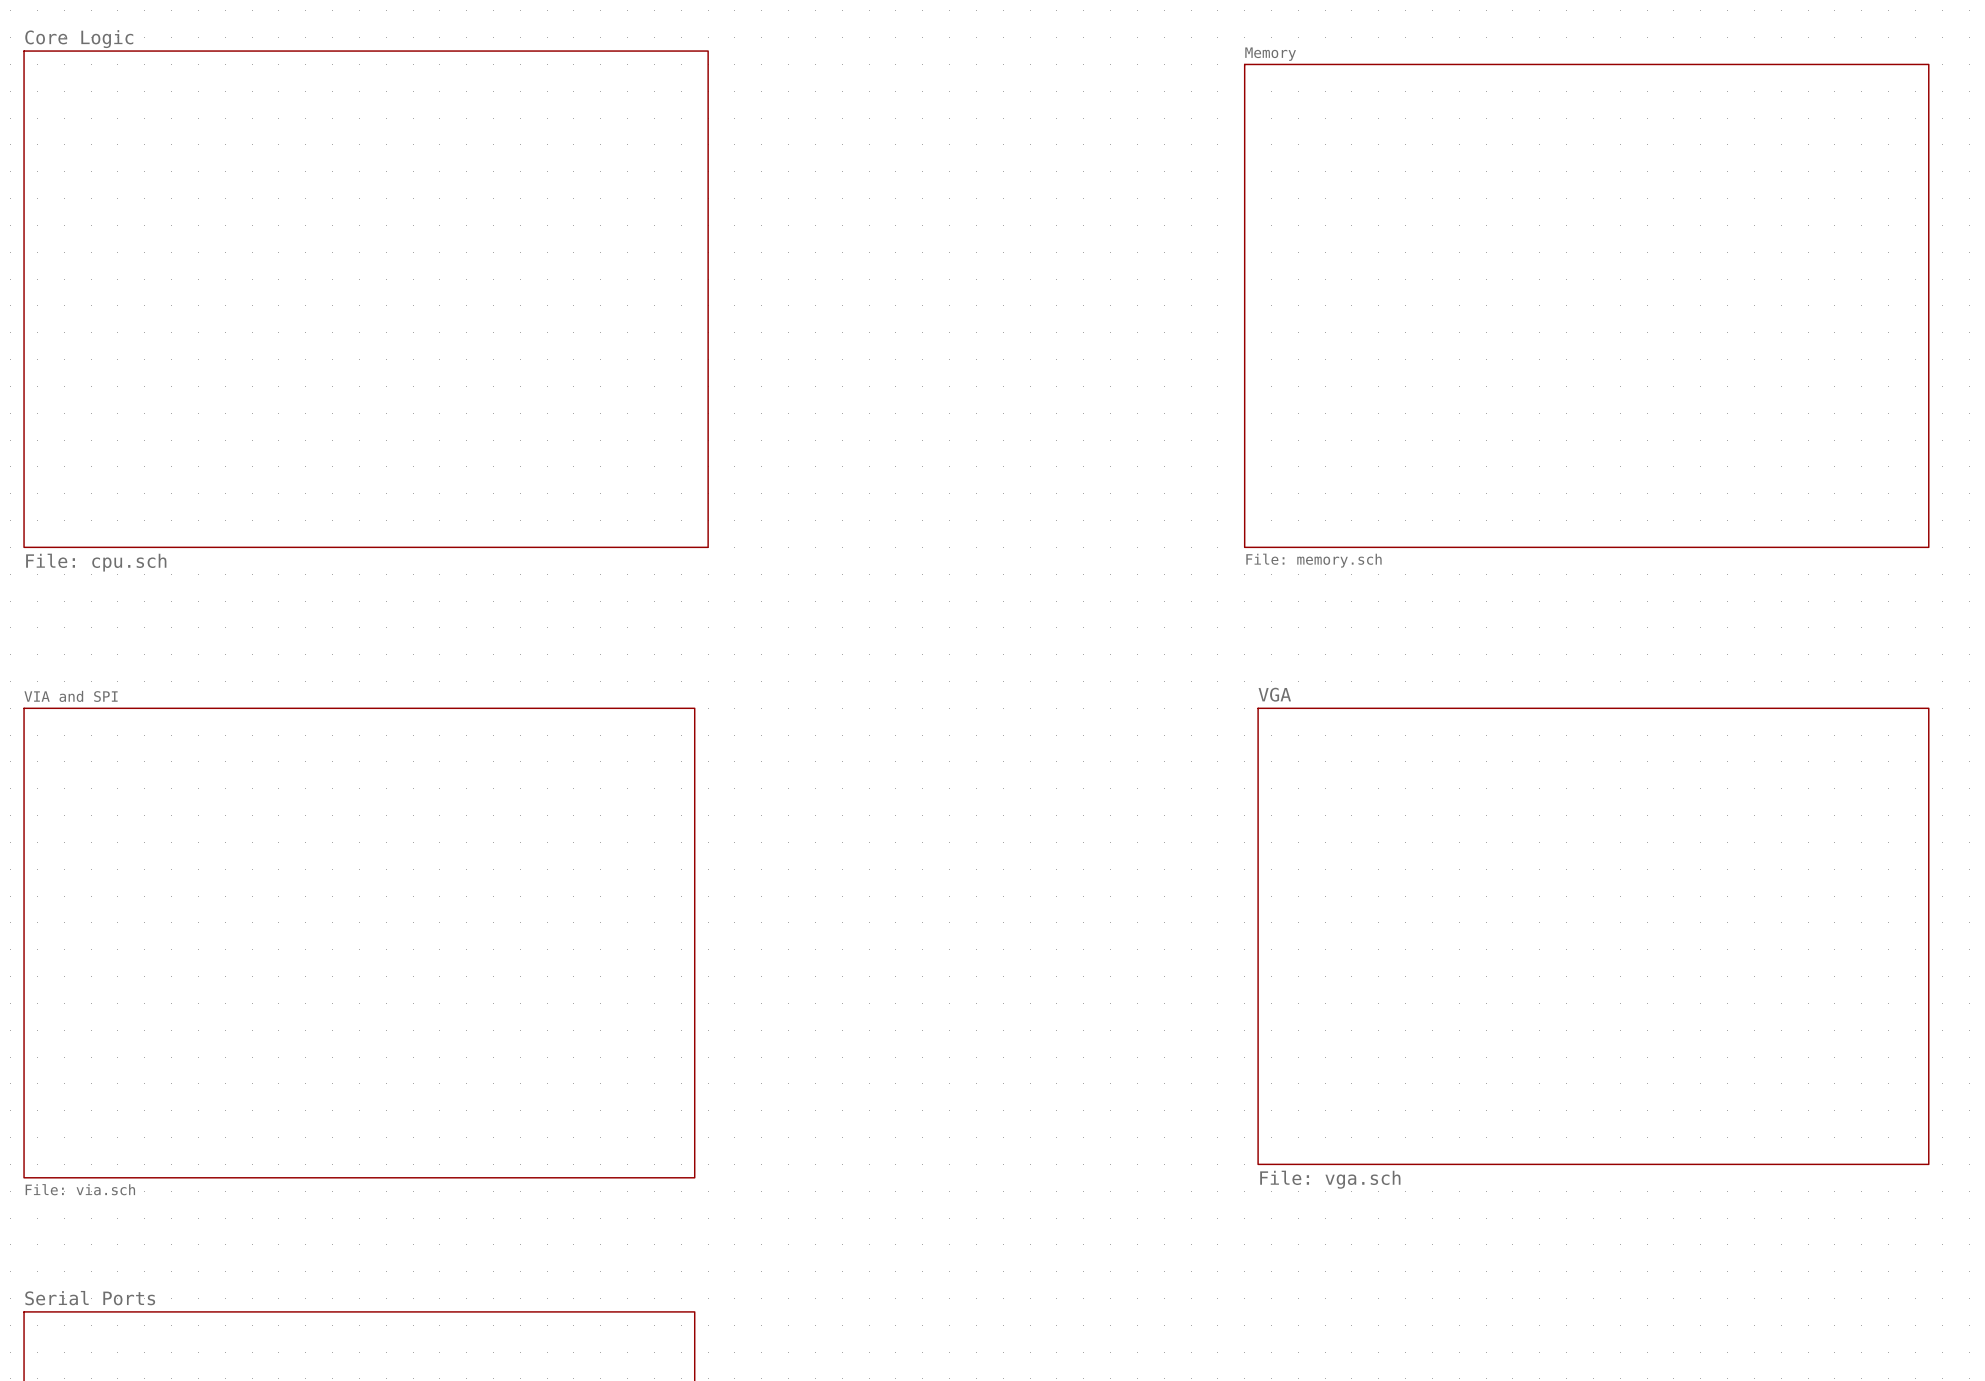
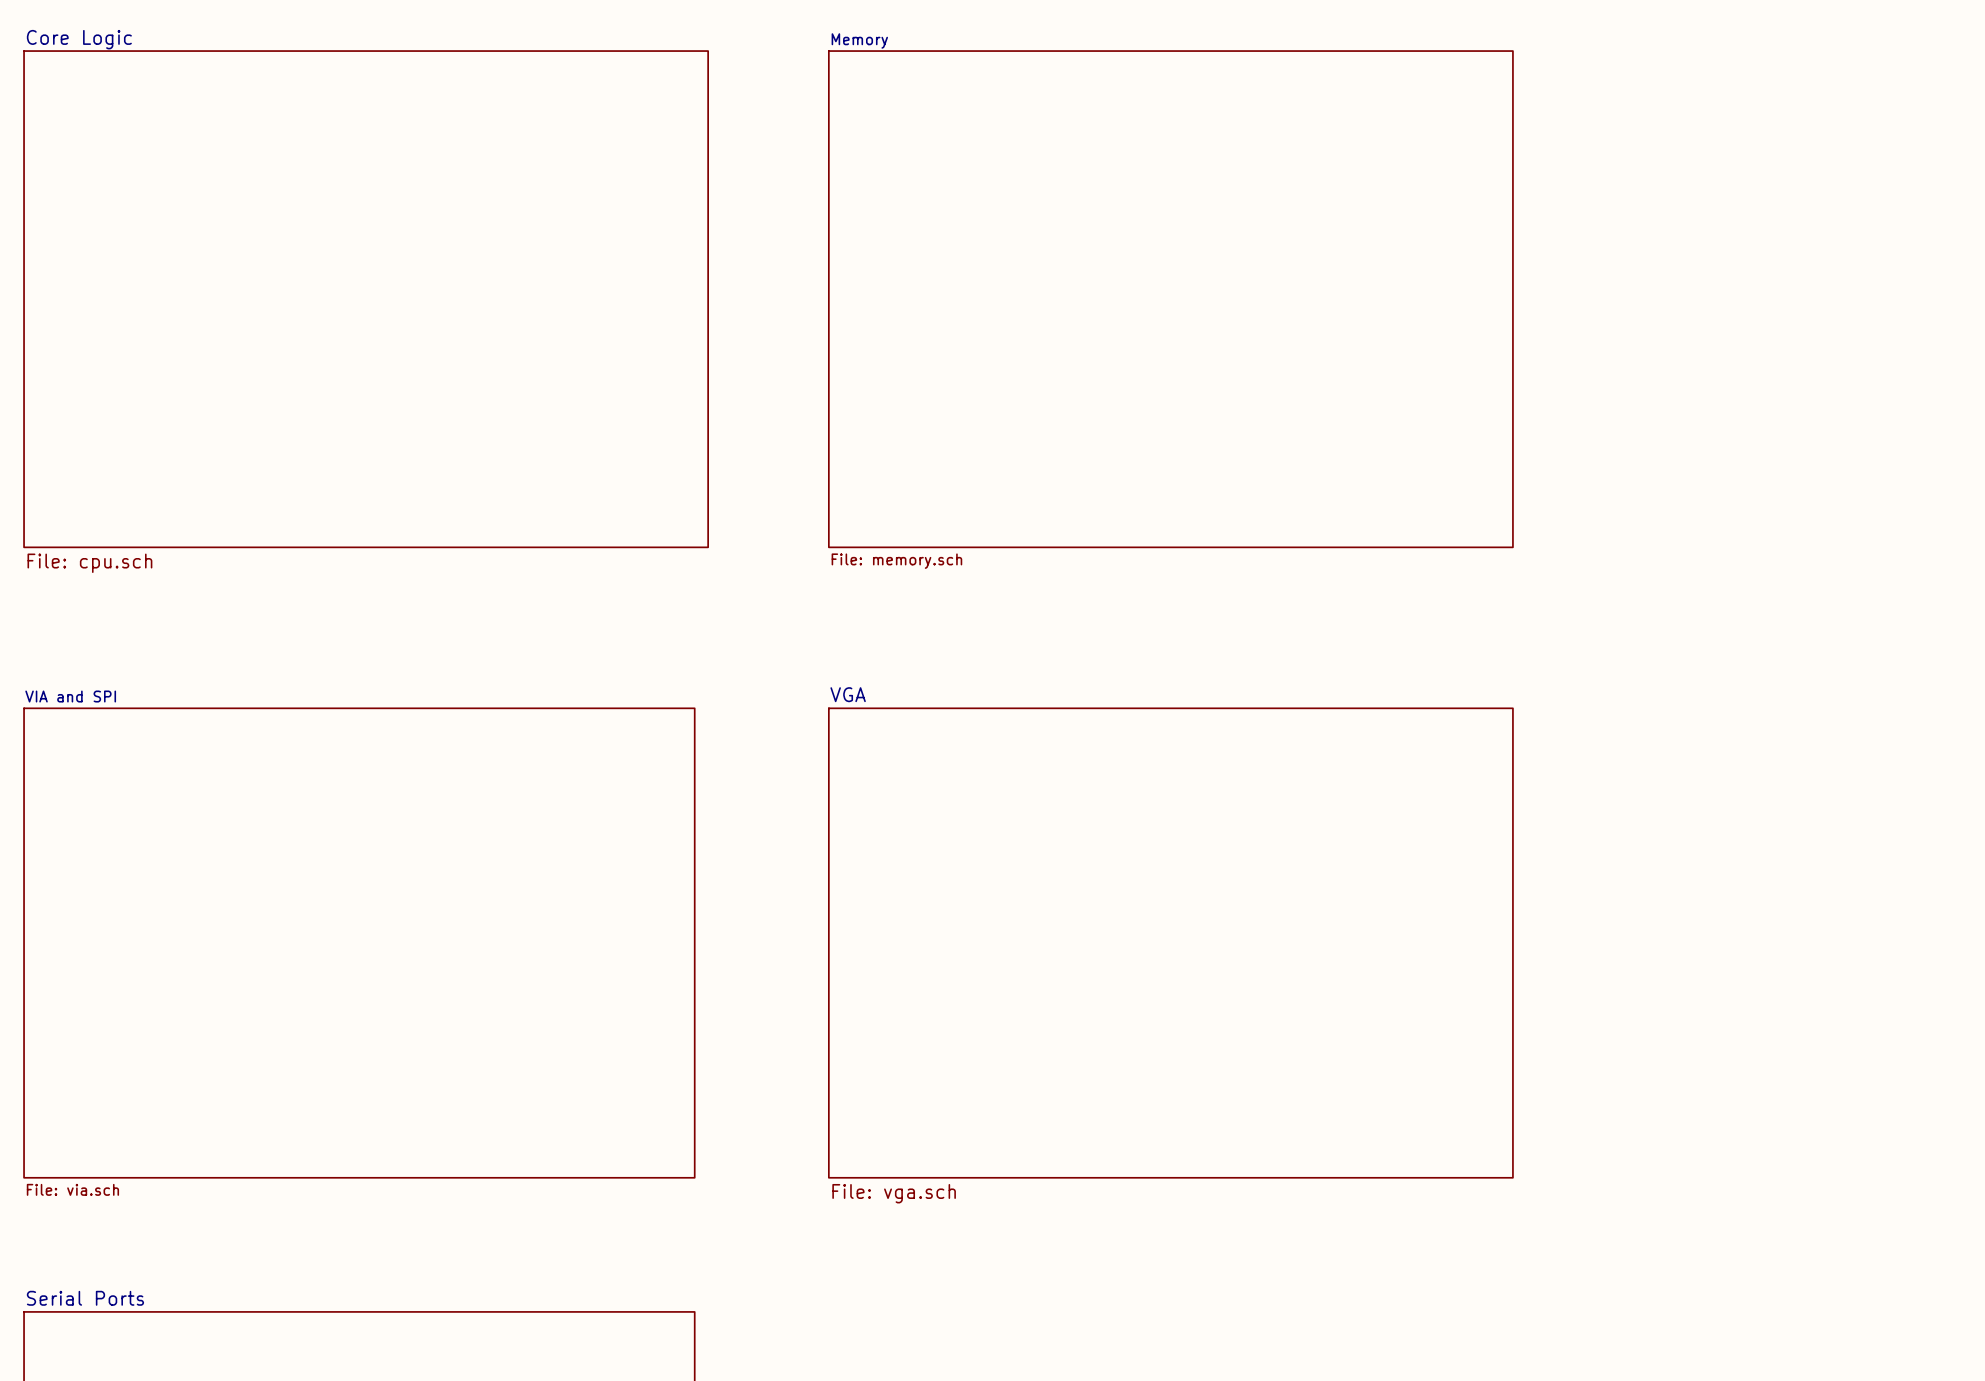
sheet Memory: none -> File: memory.sch (1170, 299)
sheet Memory: File: memory.sch (1586, 305) -> none
sheet VGA: File: vga.sch (1593, 936) -> none
sheet VGA: none -> File: vga.sch (1170, 943)

